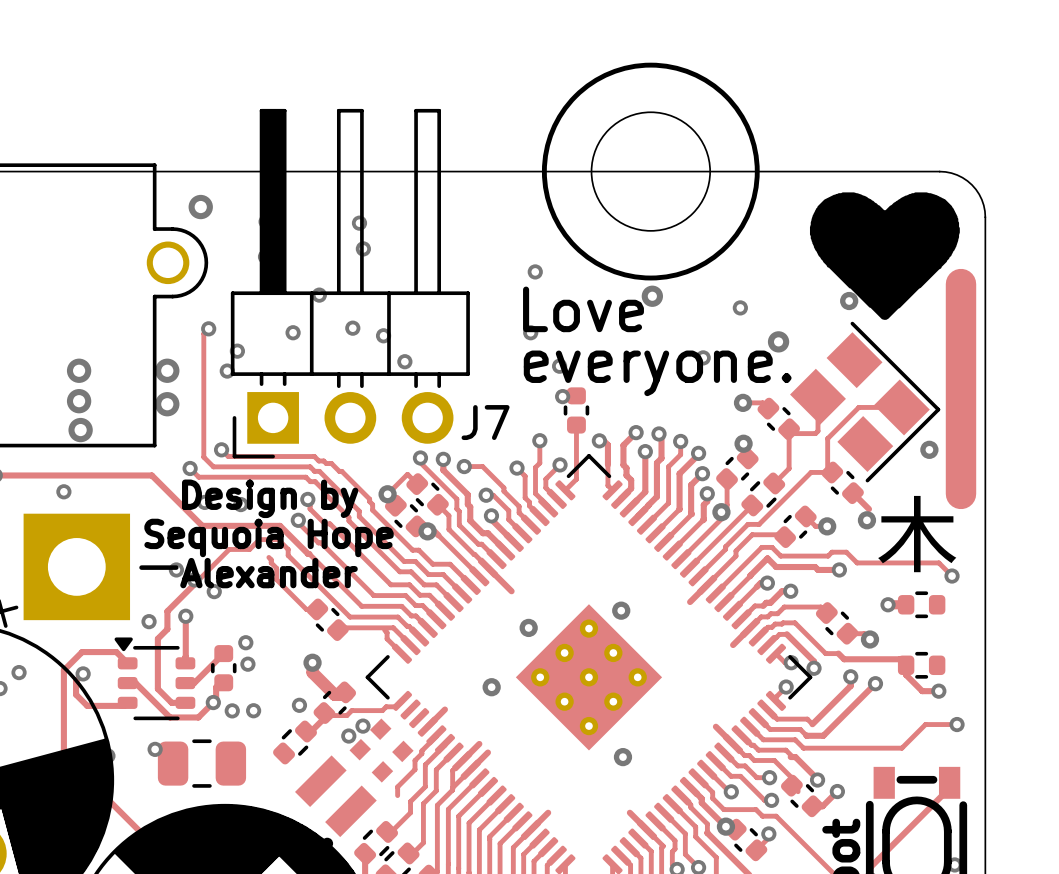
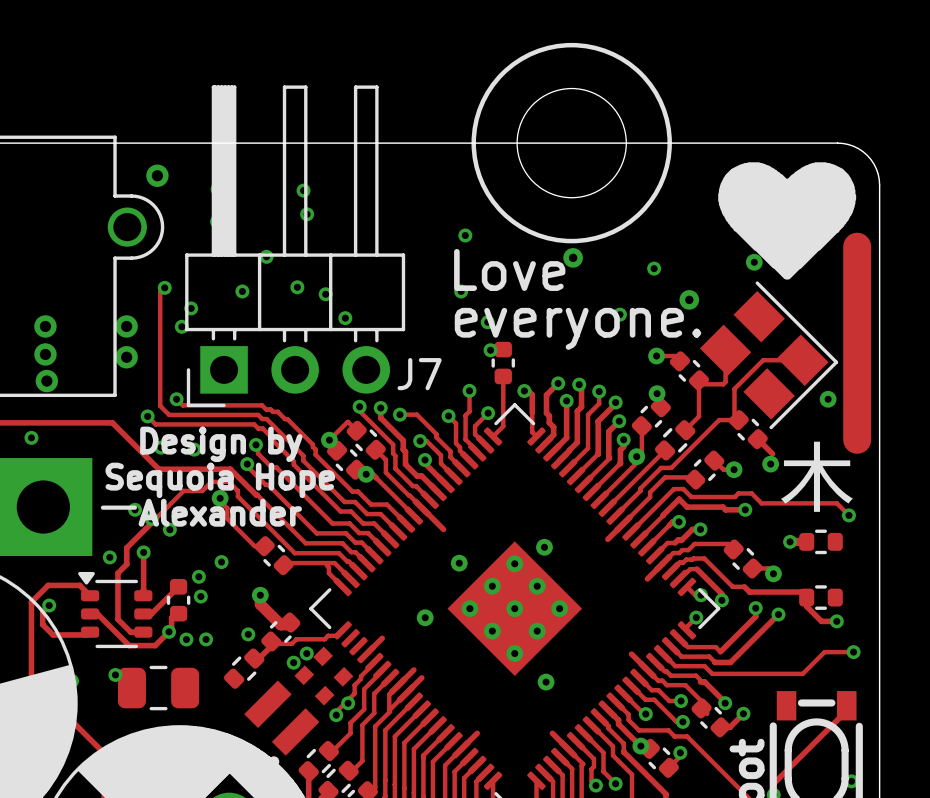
via: none -> (220, 498)
via: none -> (221, 562)
via: none -> (348, 703)
via: none -> (336, 715)

